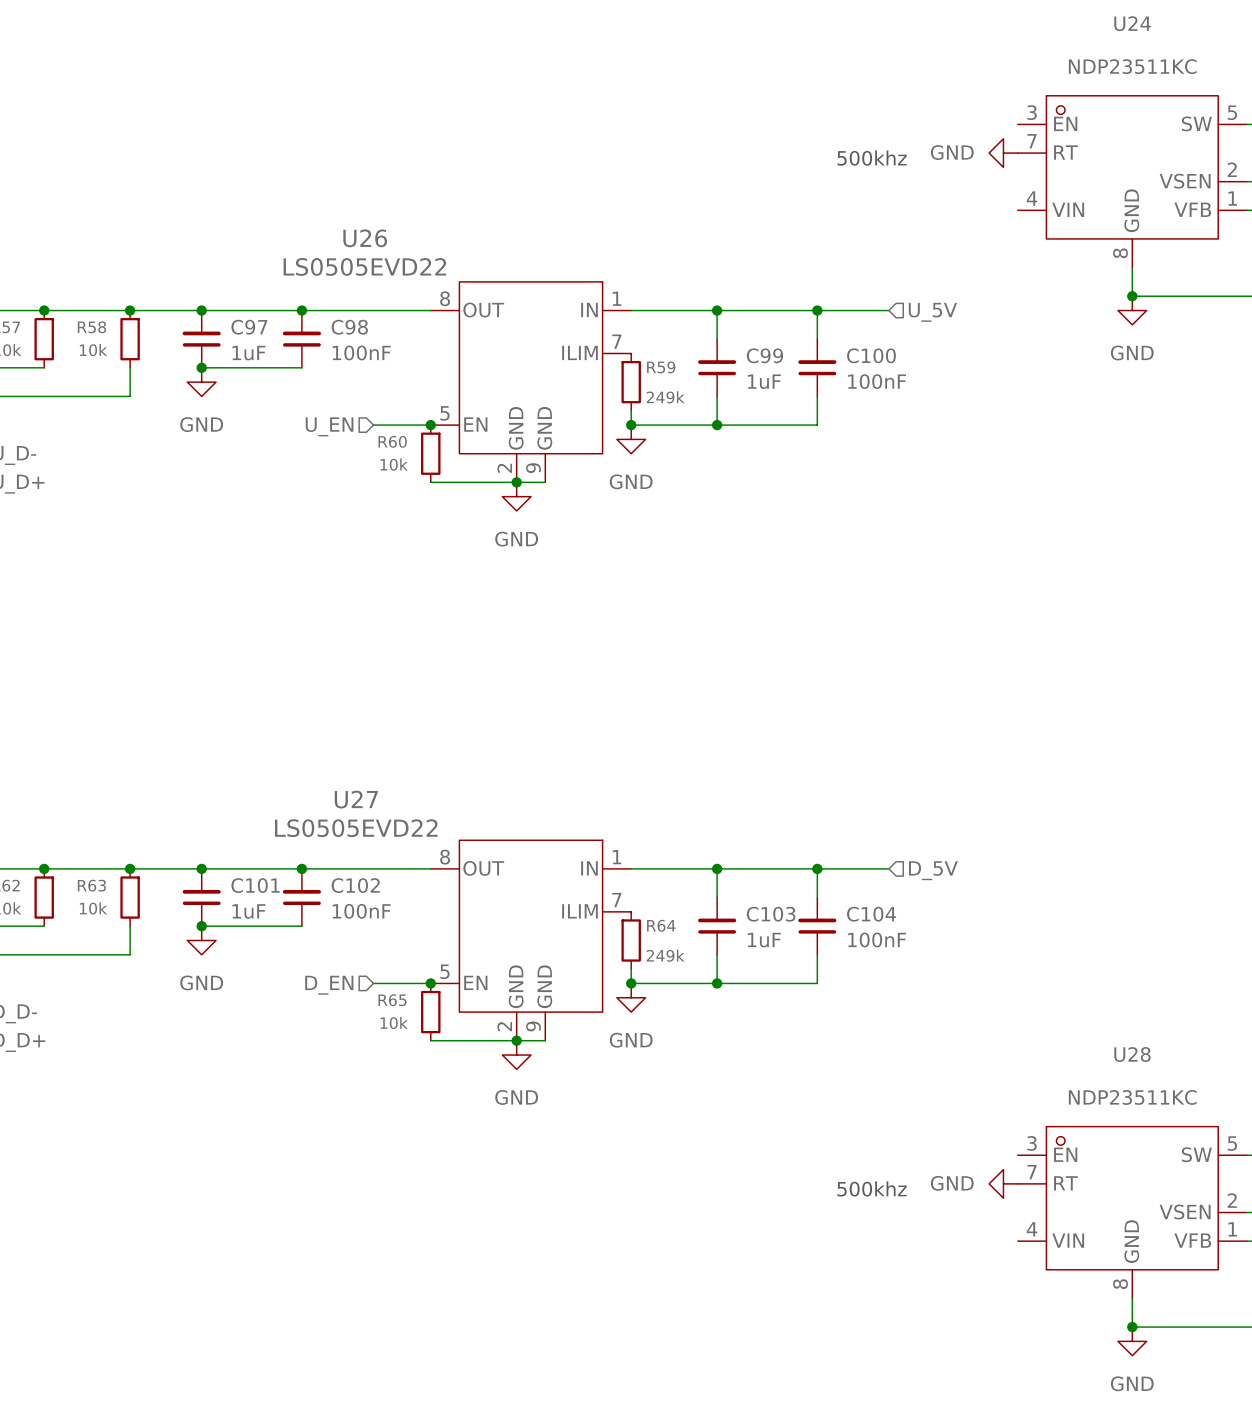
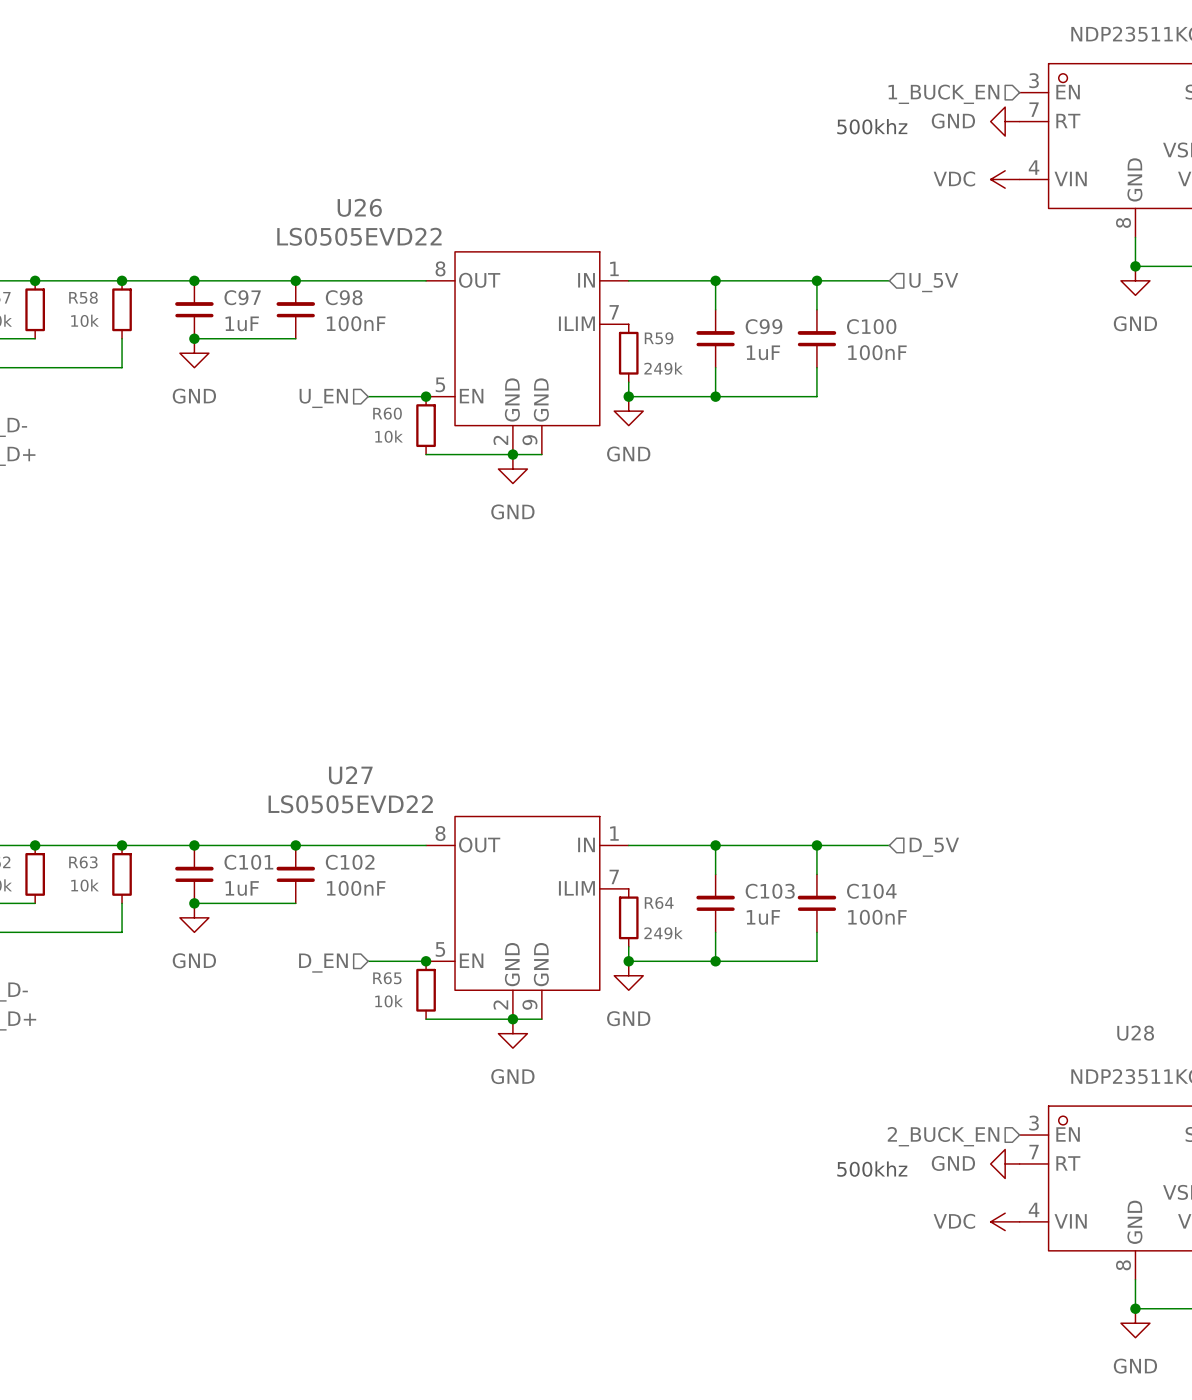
hierarchical label: none -> 1_BUCK_EN (943, 94)
power symbol: none -> VDC (1005, 179)
hierarchical label: none -> 2_BUCK_EN (943, 1136)
power symbol: none -> VDC (1005, 1221)

